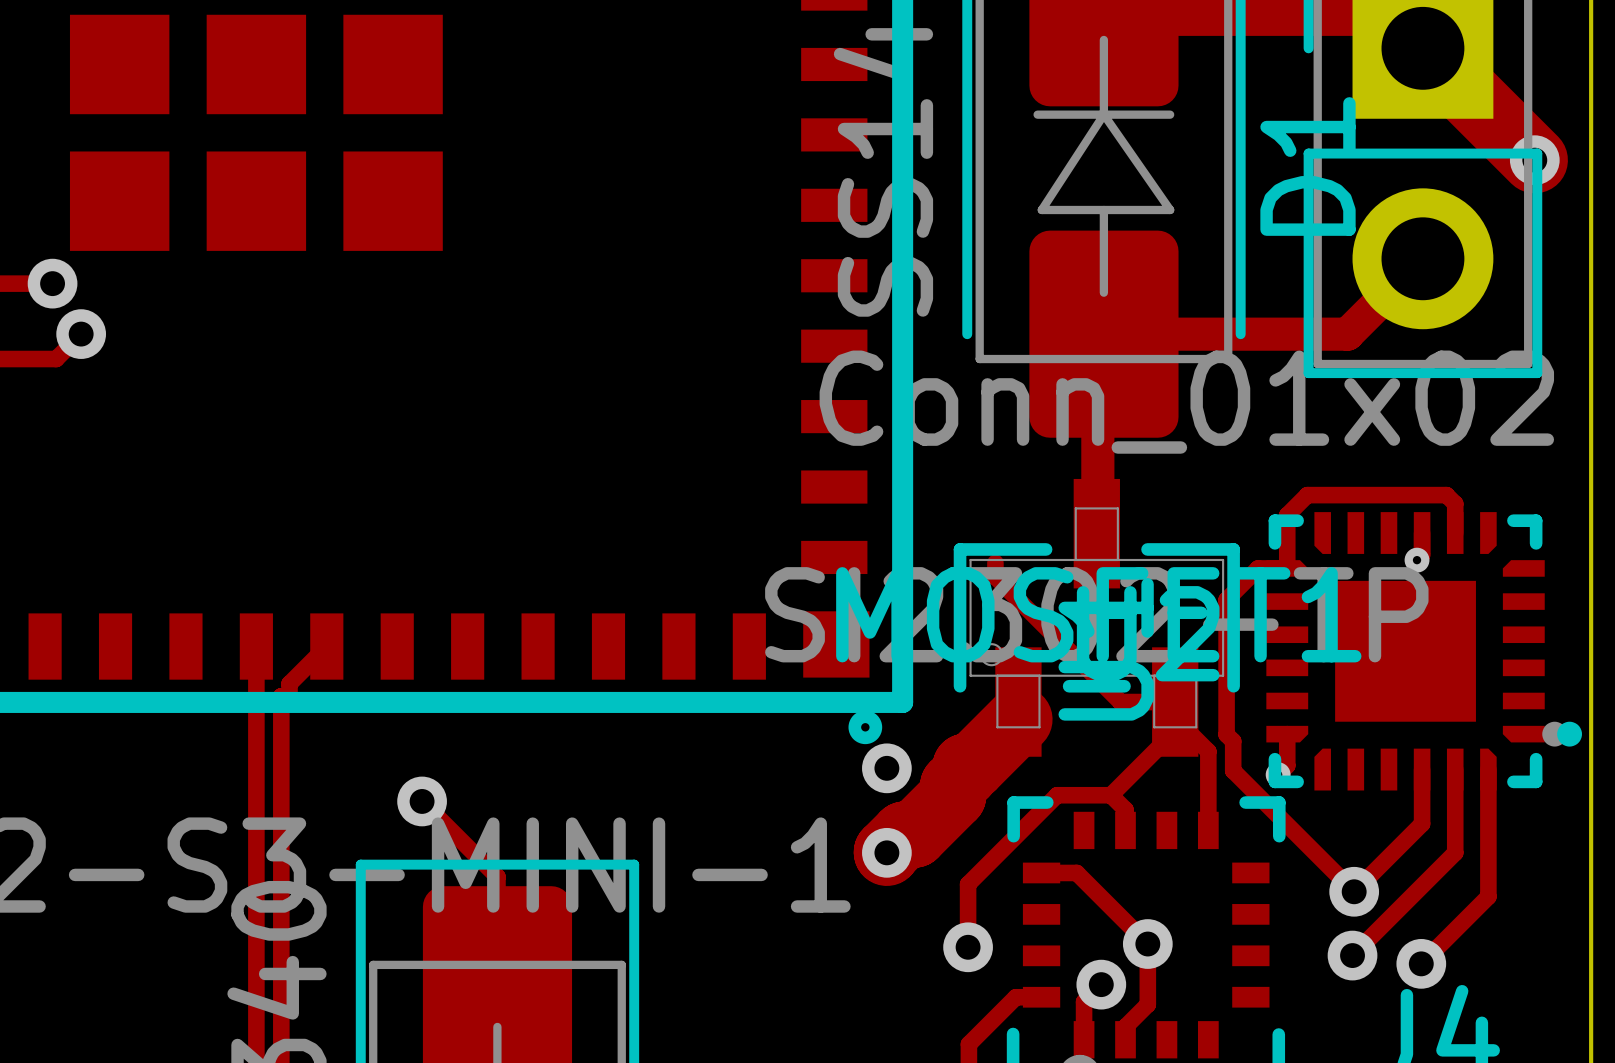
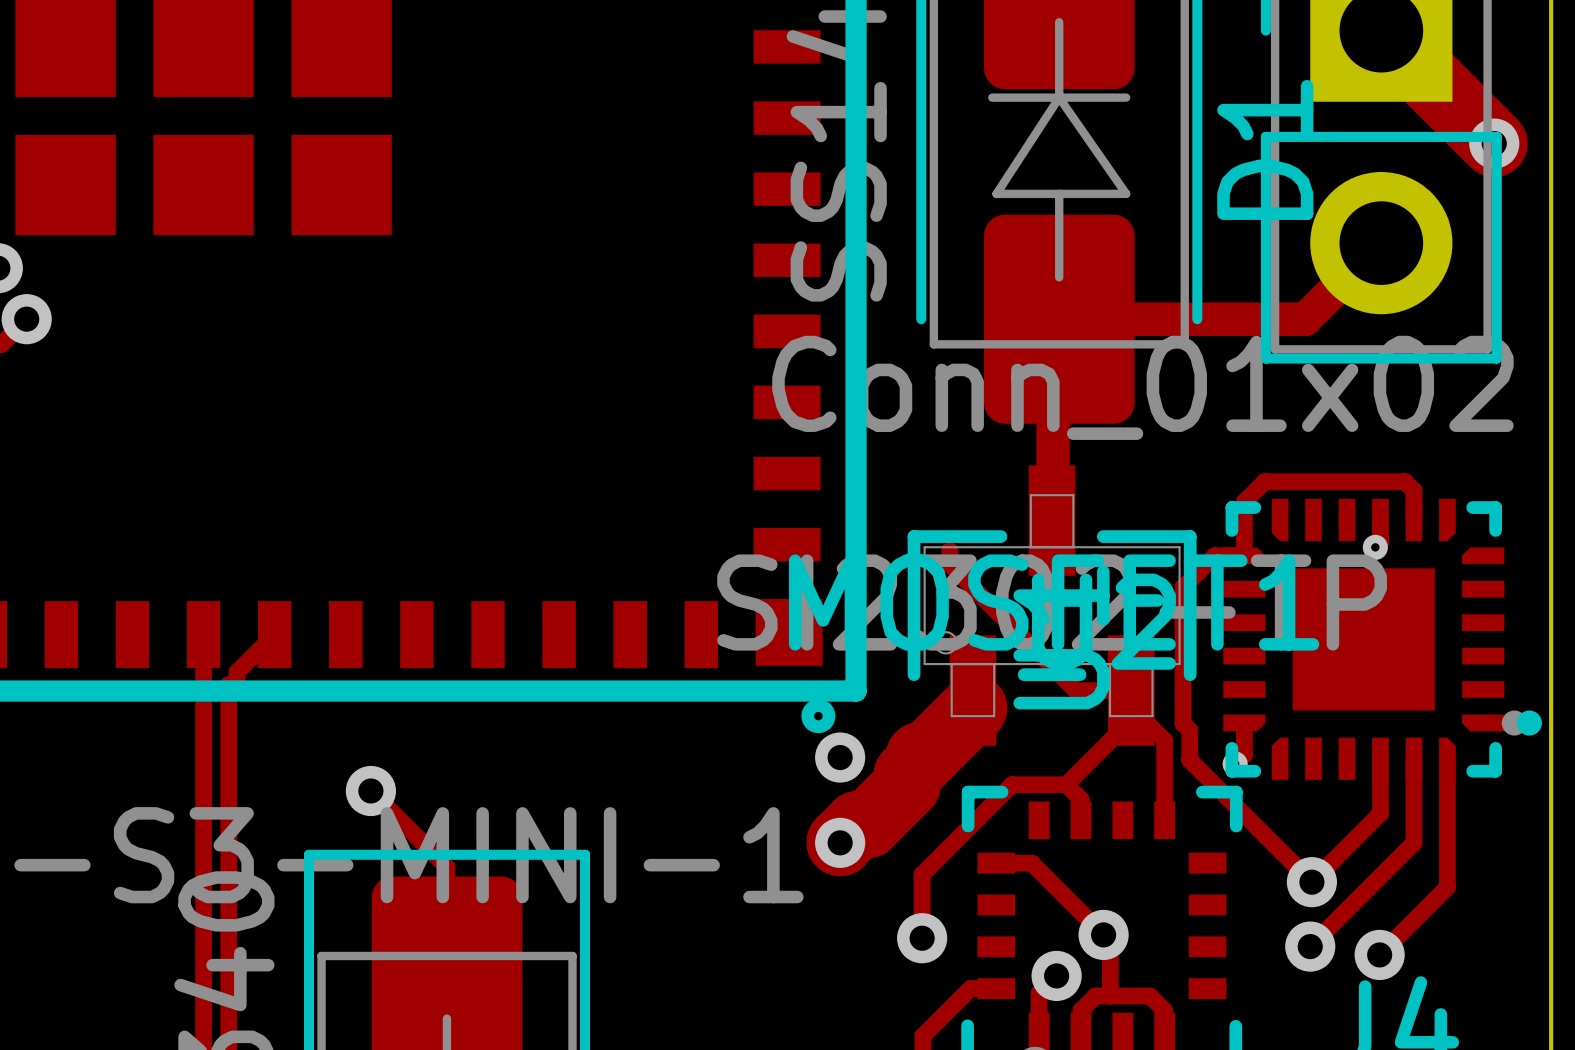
track: (1147, 944) (1147, 1004) (1125, 1026) -> (1164, 1031) (1164, 1010) (1150, 996) (1095, 996) (1081, 1010) (1081, 1018)
track: none -> (1110, 941) (1110, 996)

